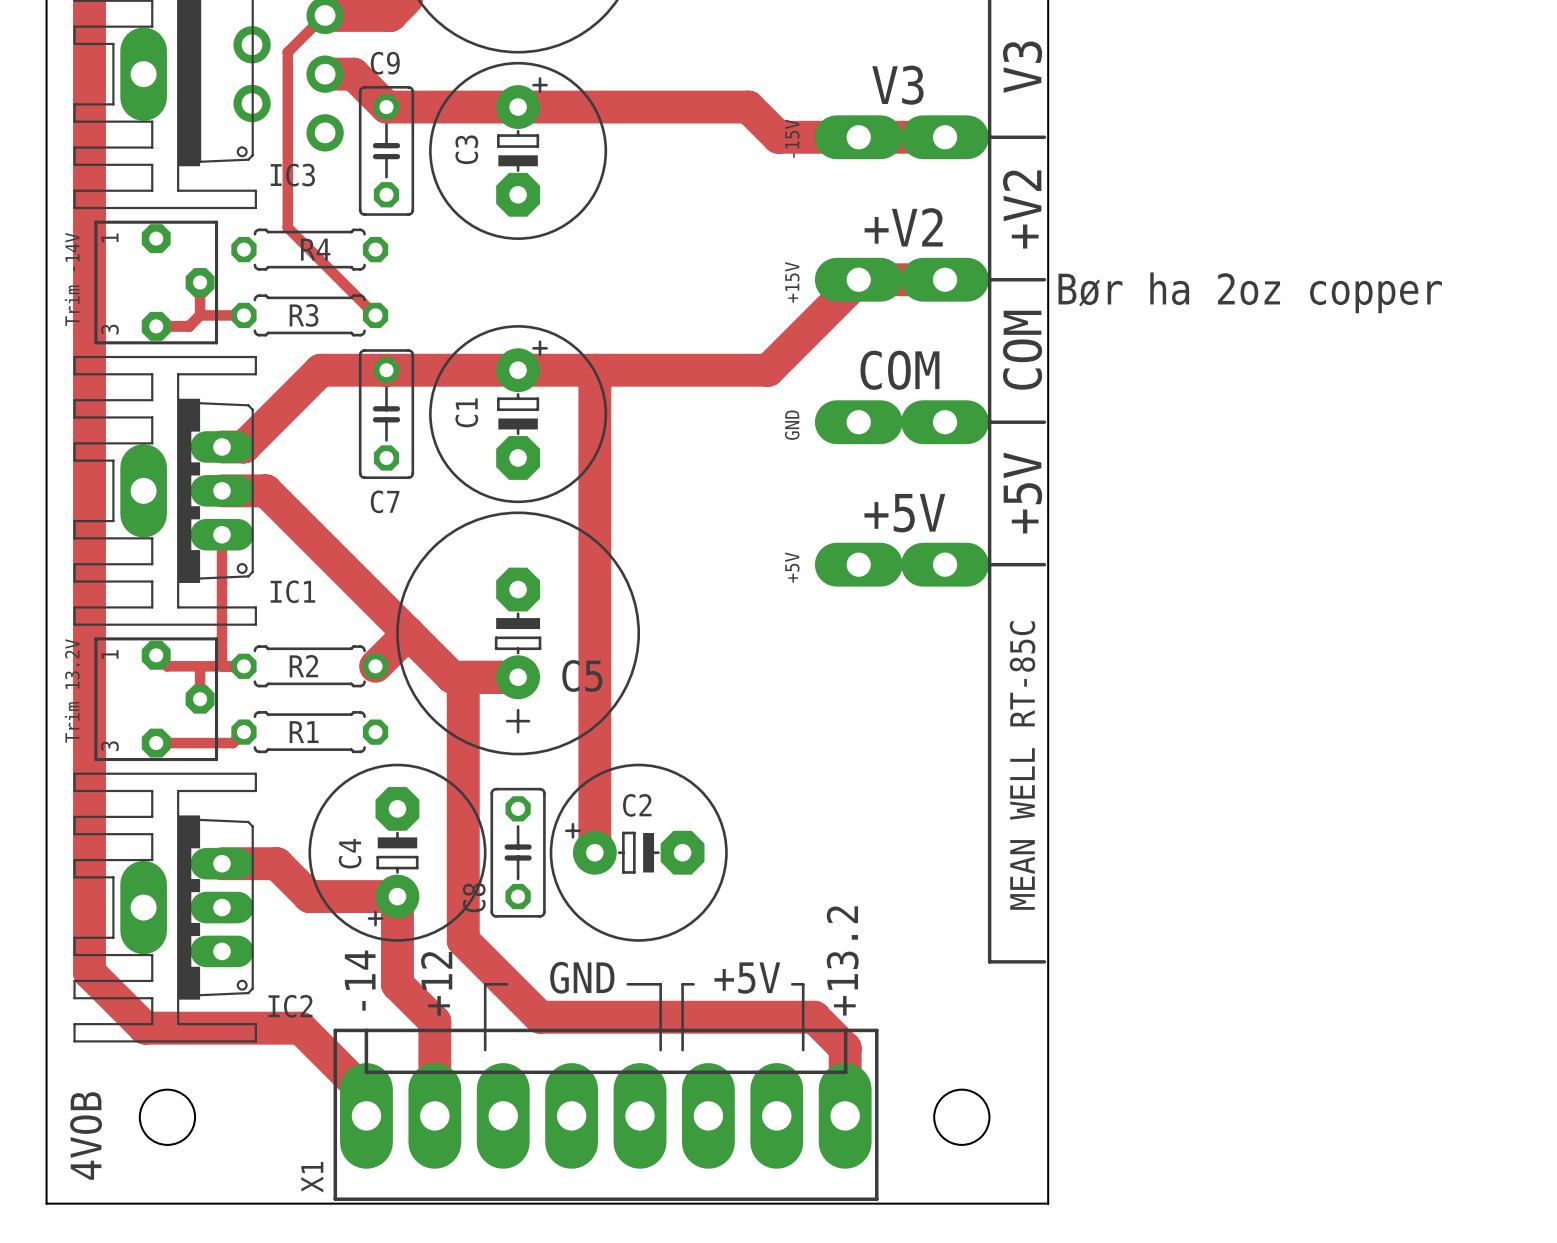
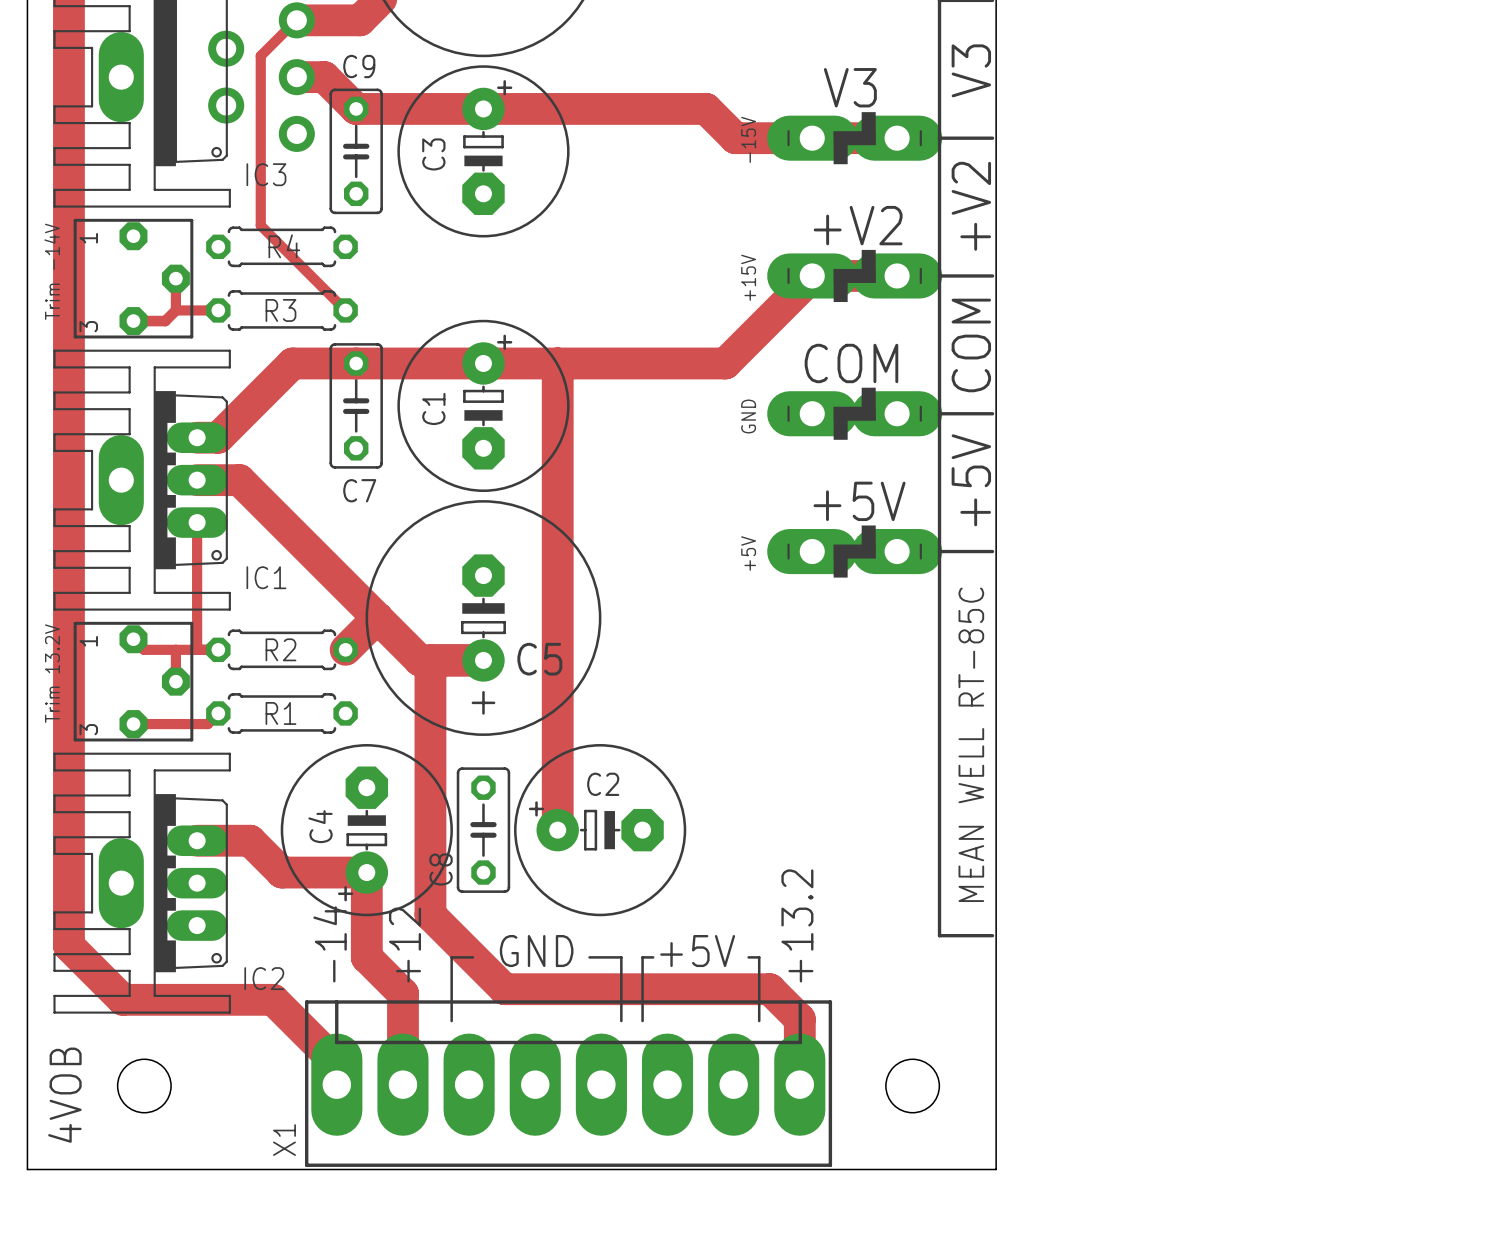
part footprint: [814, 115, 989, 160] -> [767, 112, 943, 165]
part footprint: [814, 257, 989, 302] -> [767, 249, 943, 303]
text: Bør ha 2oz copper (1250, 292) -> none
part footprint: [814, 400, 989, 445] -> [767, 387, 943, 440]
part footprint: [814, 542, 989, 587] -> [767, 525, 943, 578]

